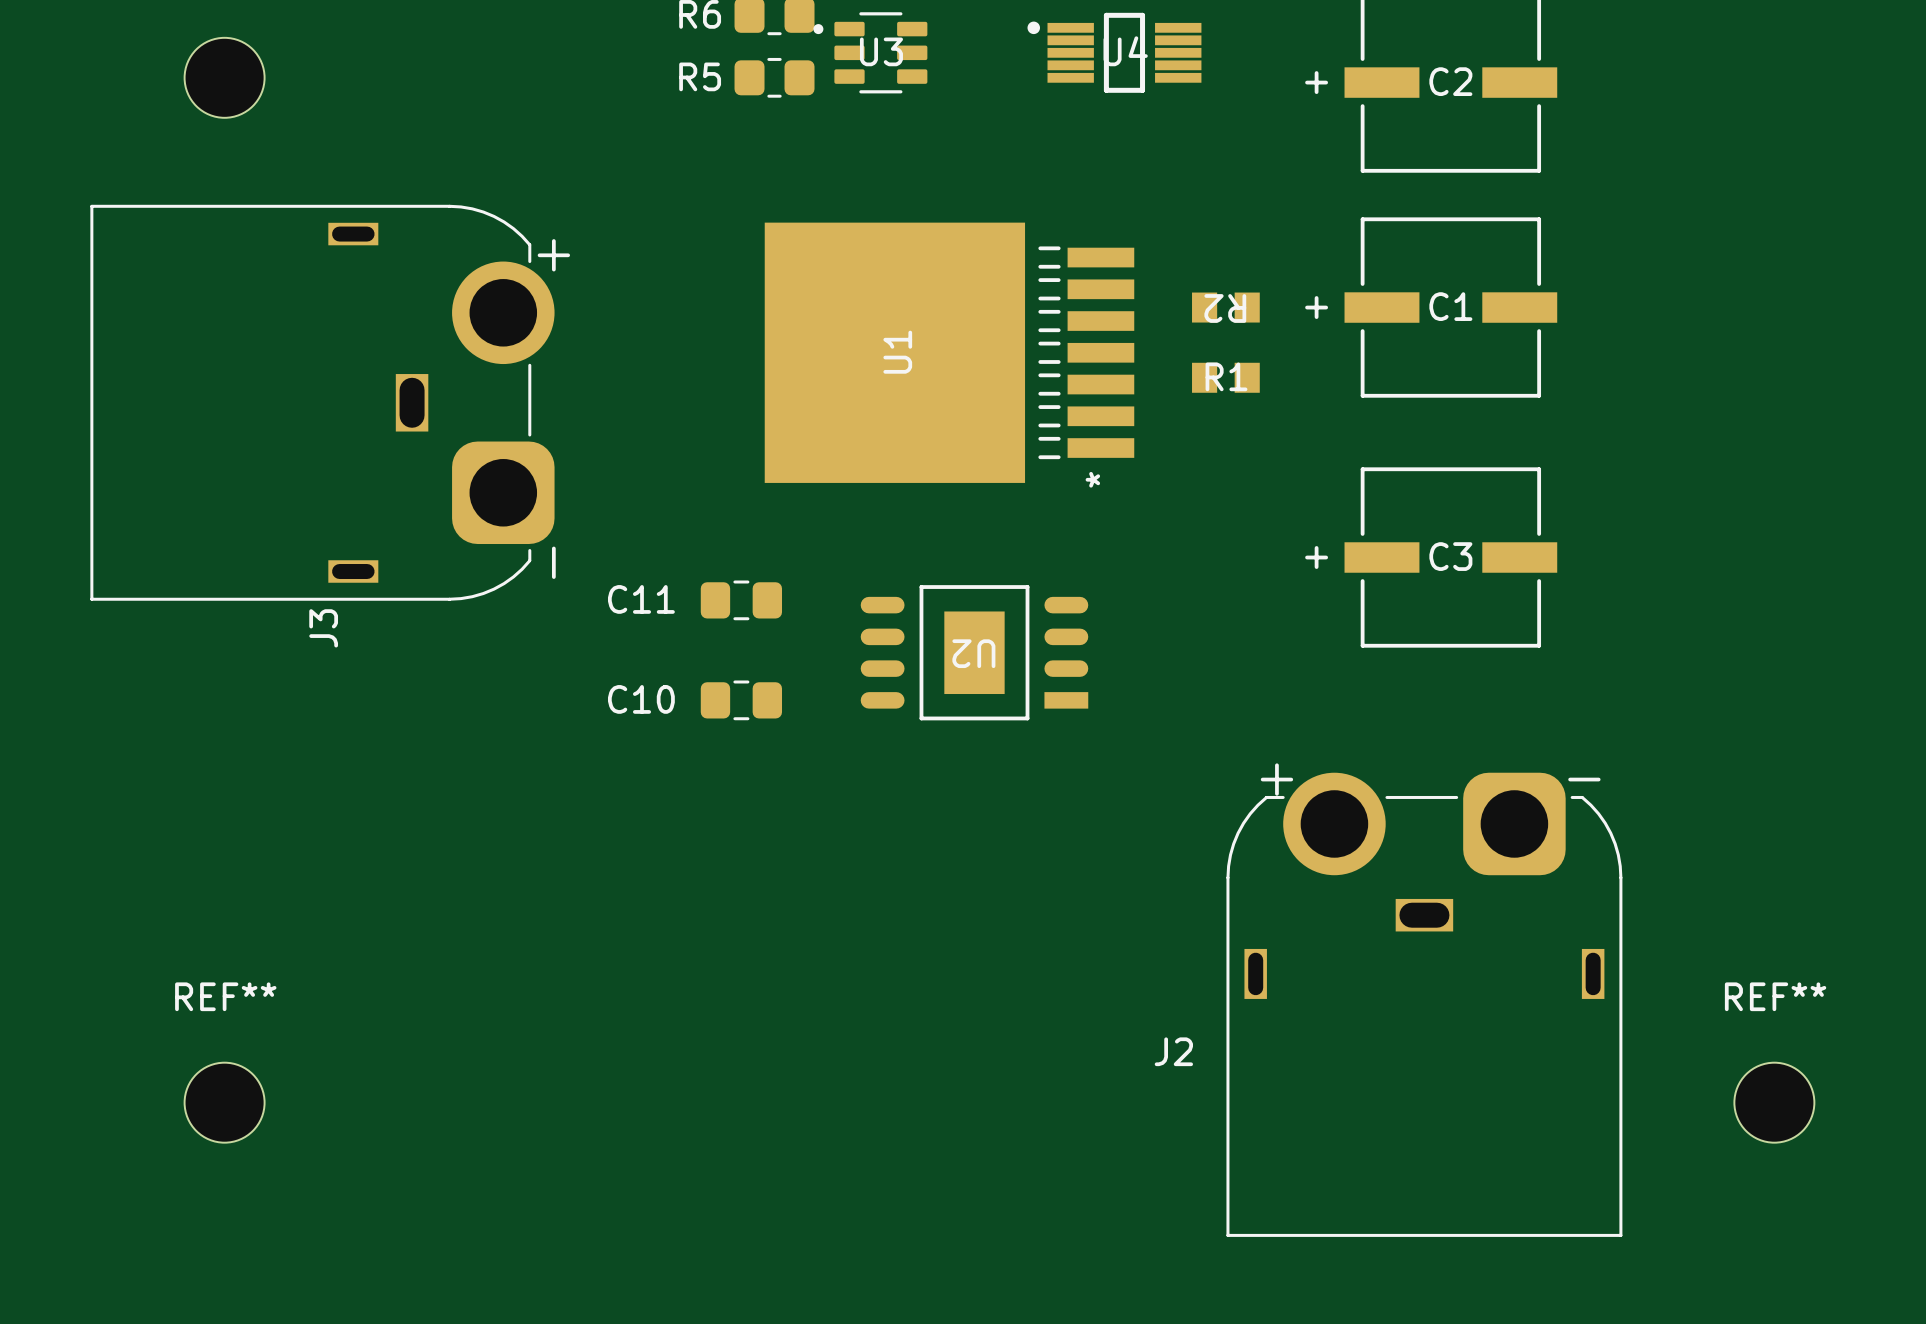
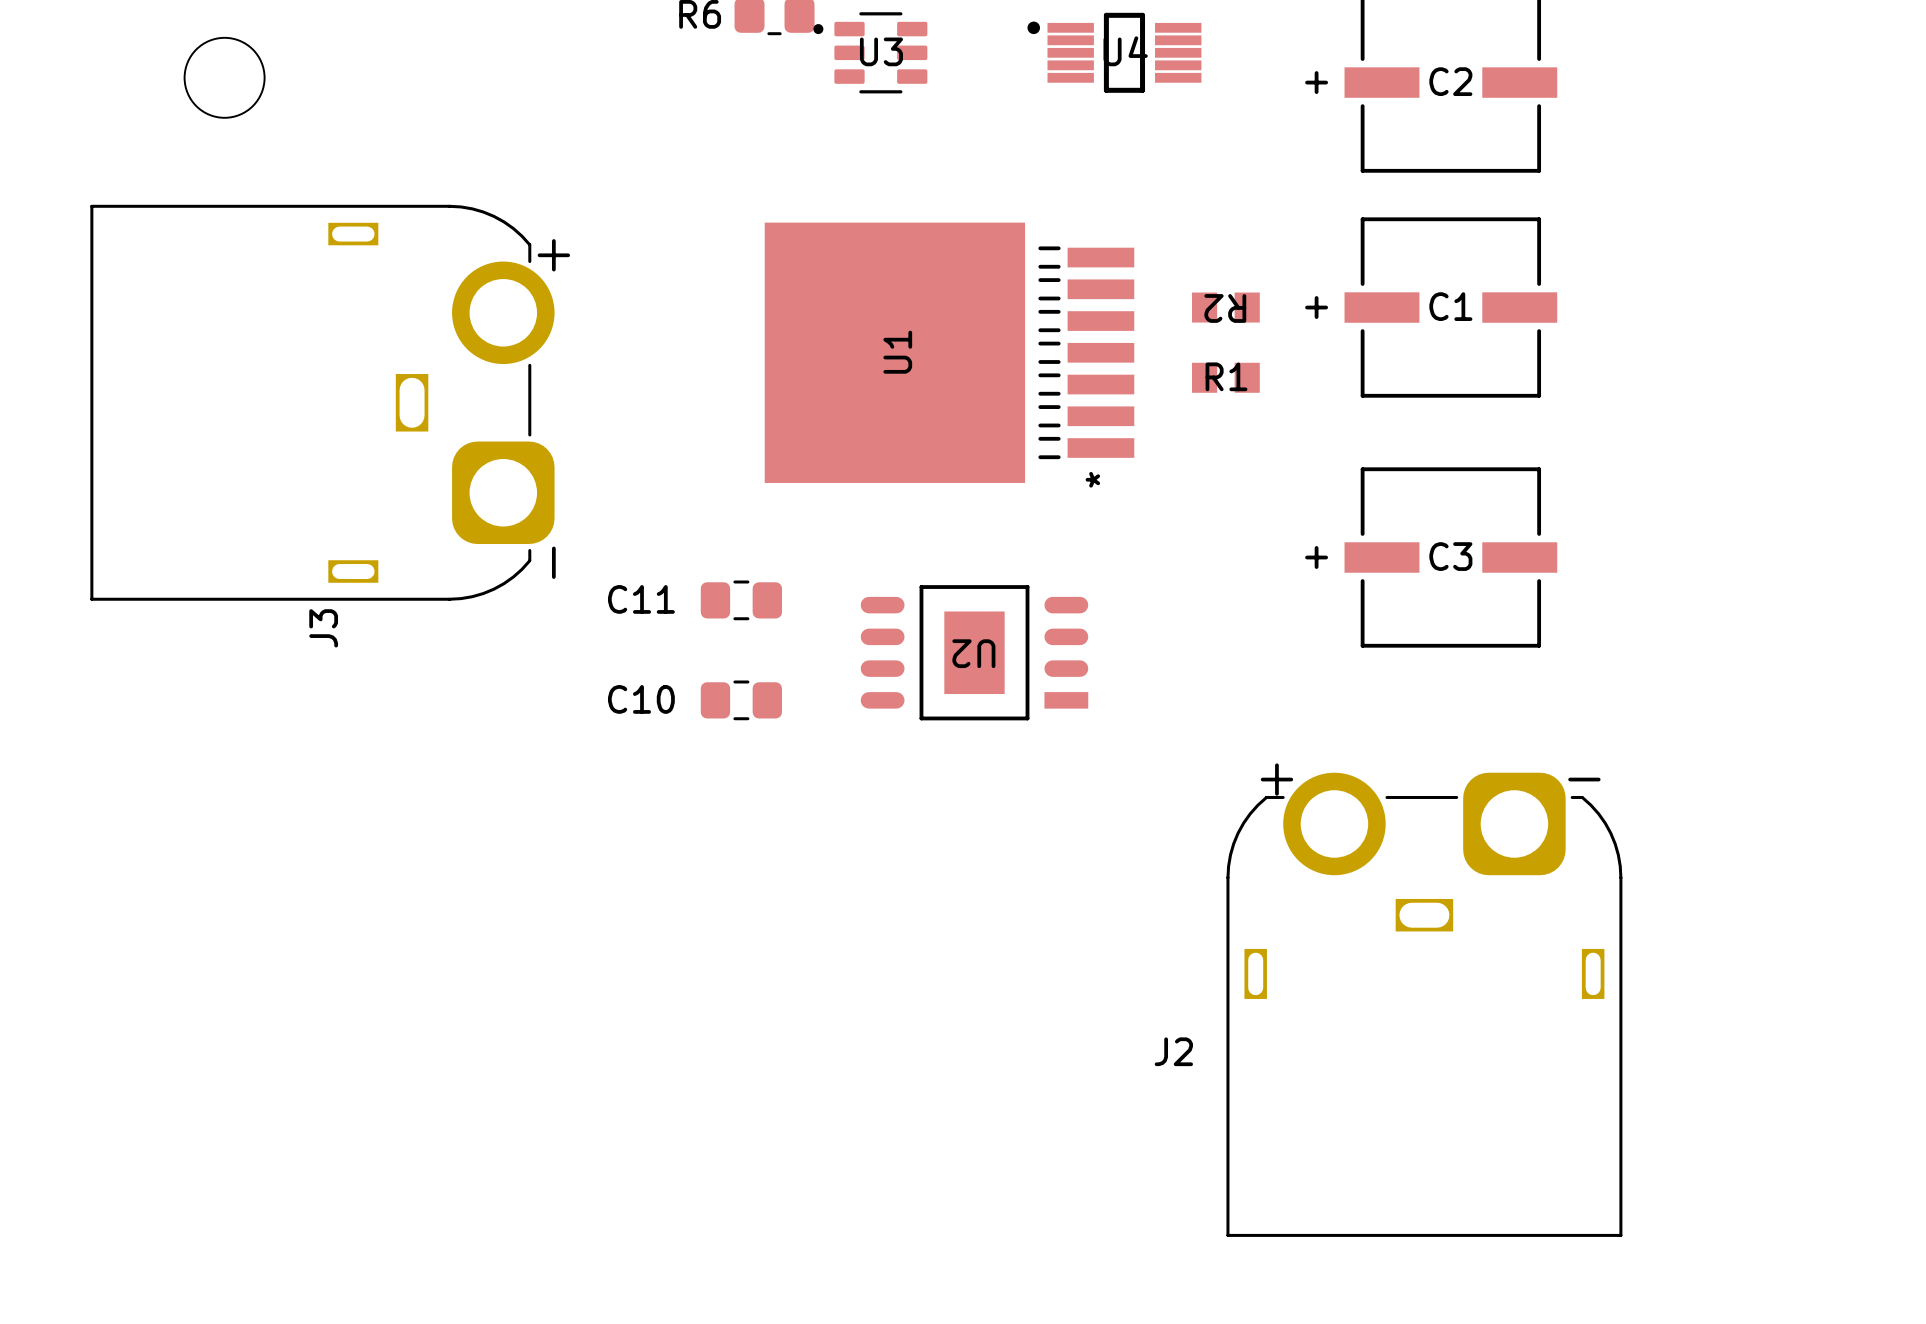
R5: (774, 77) -> none
REF**: (224, 1102) -> none
REF**: (1774, 1102) -> none

